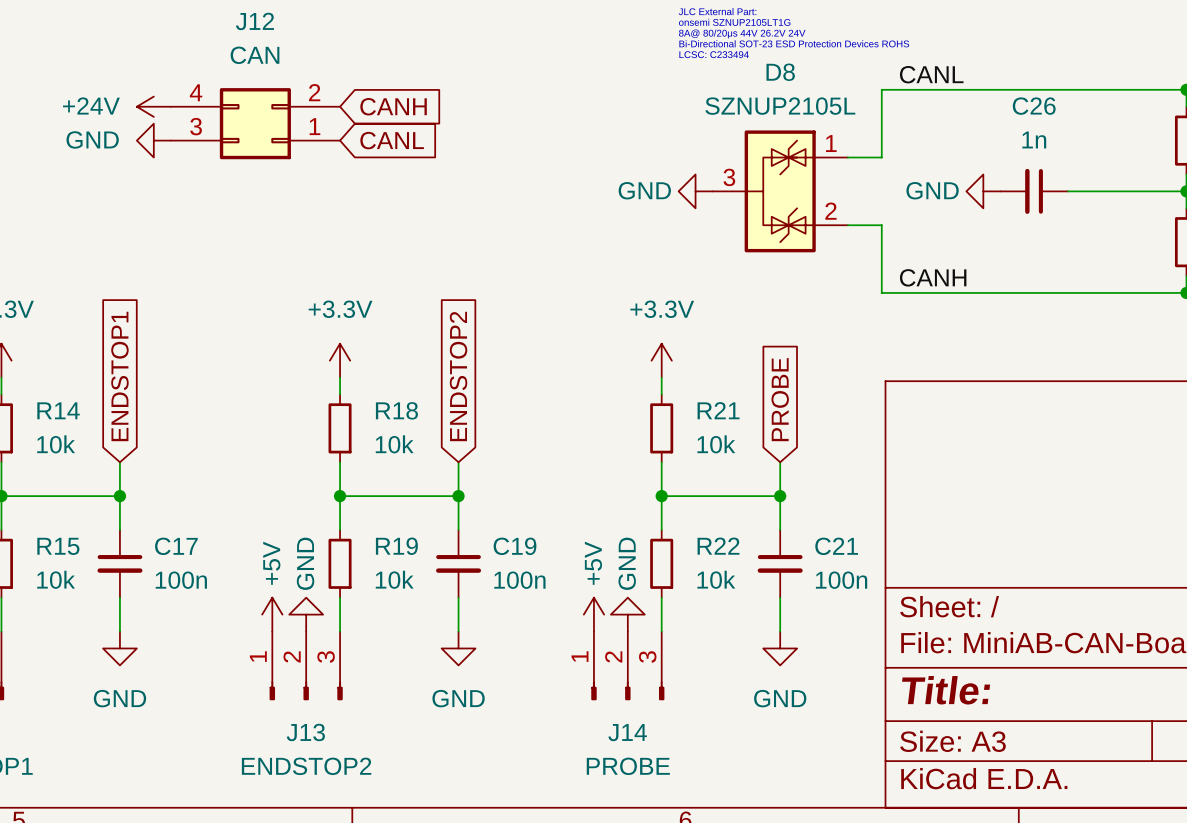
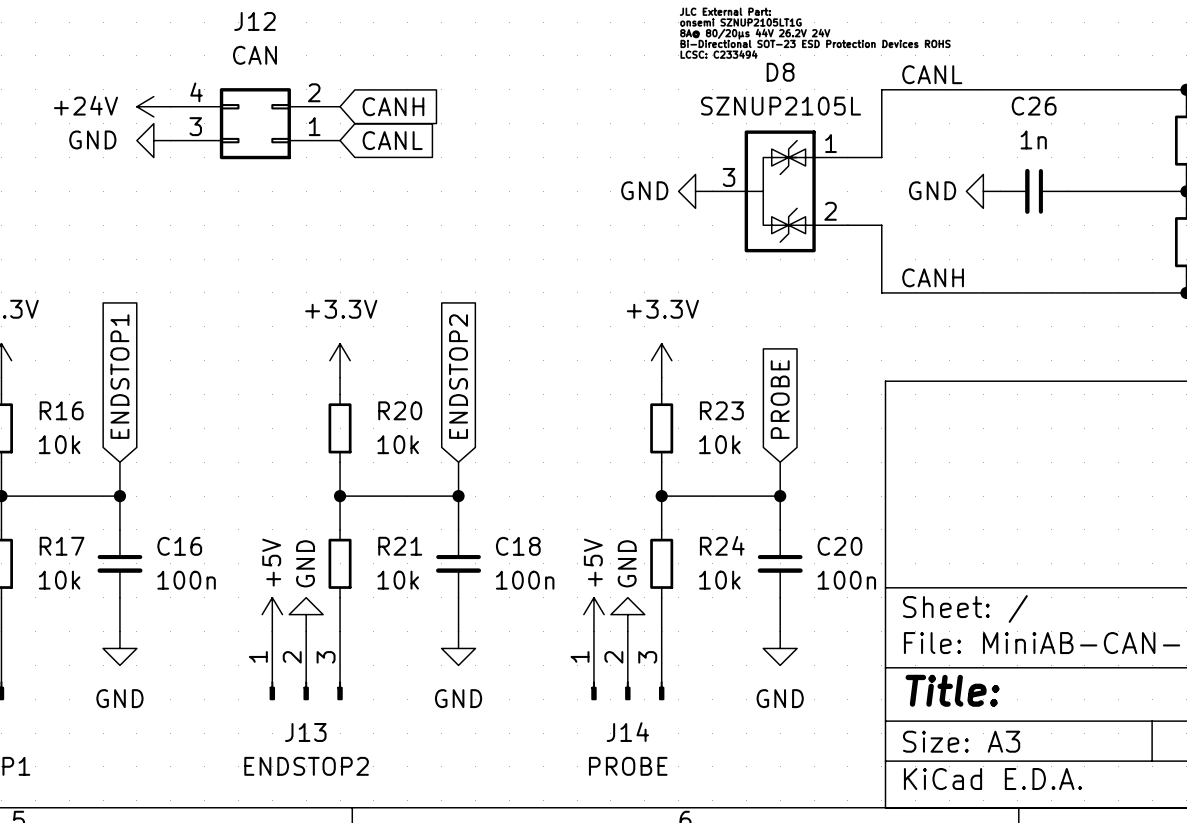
R14 name: R14 (58, 410) -> R16 (61, 410)
R18 name: R18 (396, 410) -> R20 (400, 410)
R21 name: R21 (718, 410) -> R23 (721, 410)
R15 name: R15 (58, 546) -> R17 (62, 546)
C17 name: C17 (176, 546) -> C16 (179, 546)
R19 name: R19 (396, 546) -> R21 (400, 546)
C19 name: C19 (515, 546) -> C18 (518, 546)
R22 name: R22 (718, 546) -> R24 (722, 545)
C21 name: C21 (836, 546) -> C20 (839, 546)

